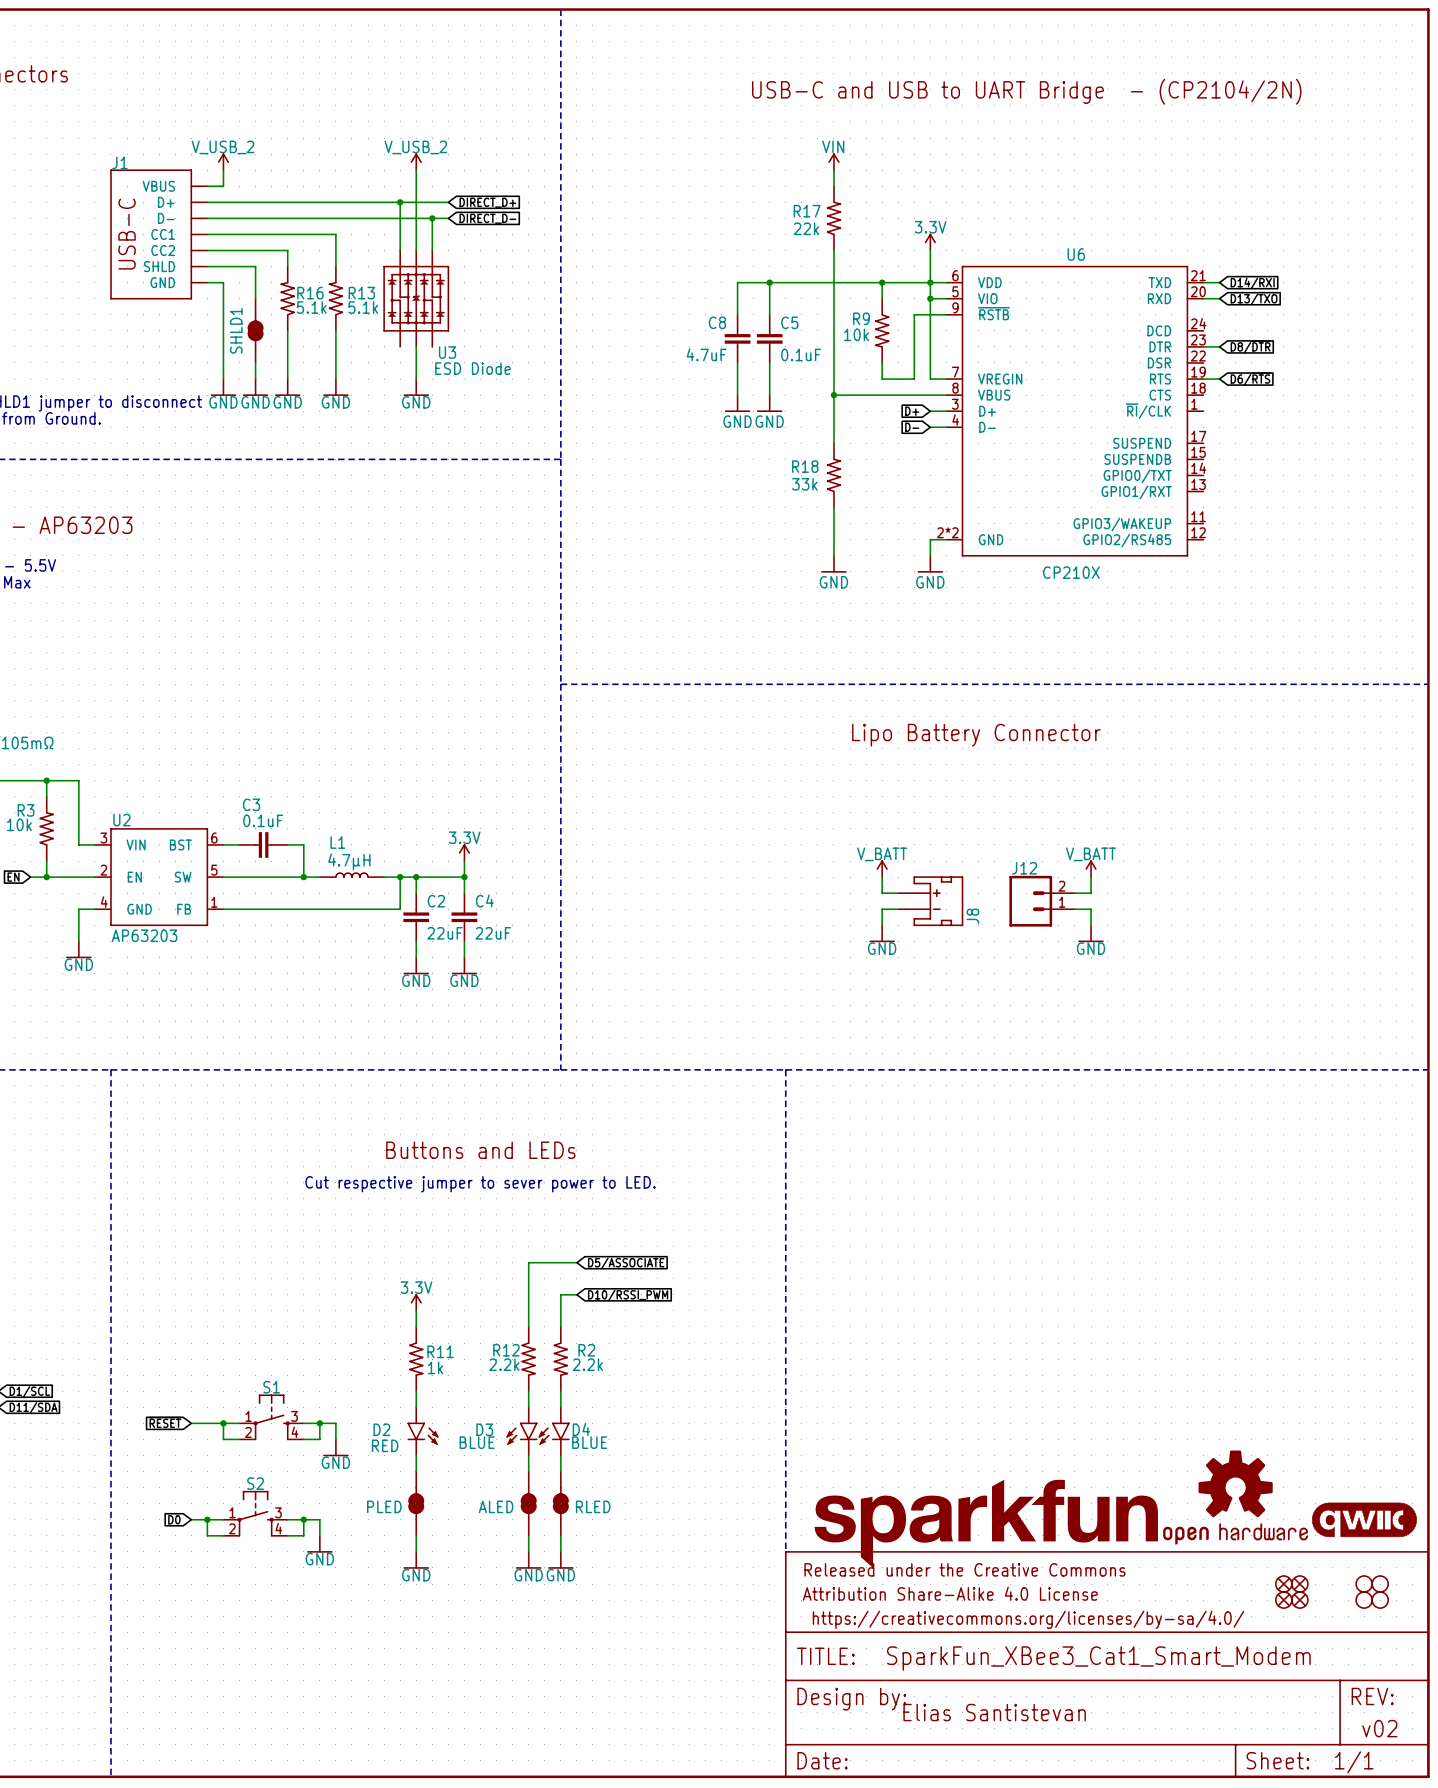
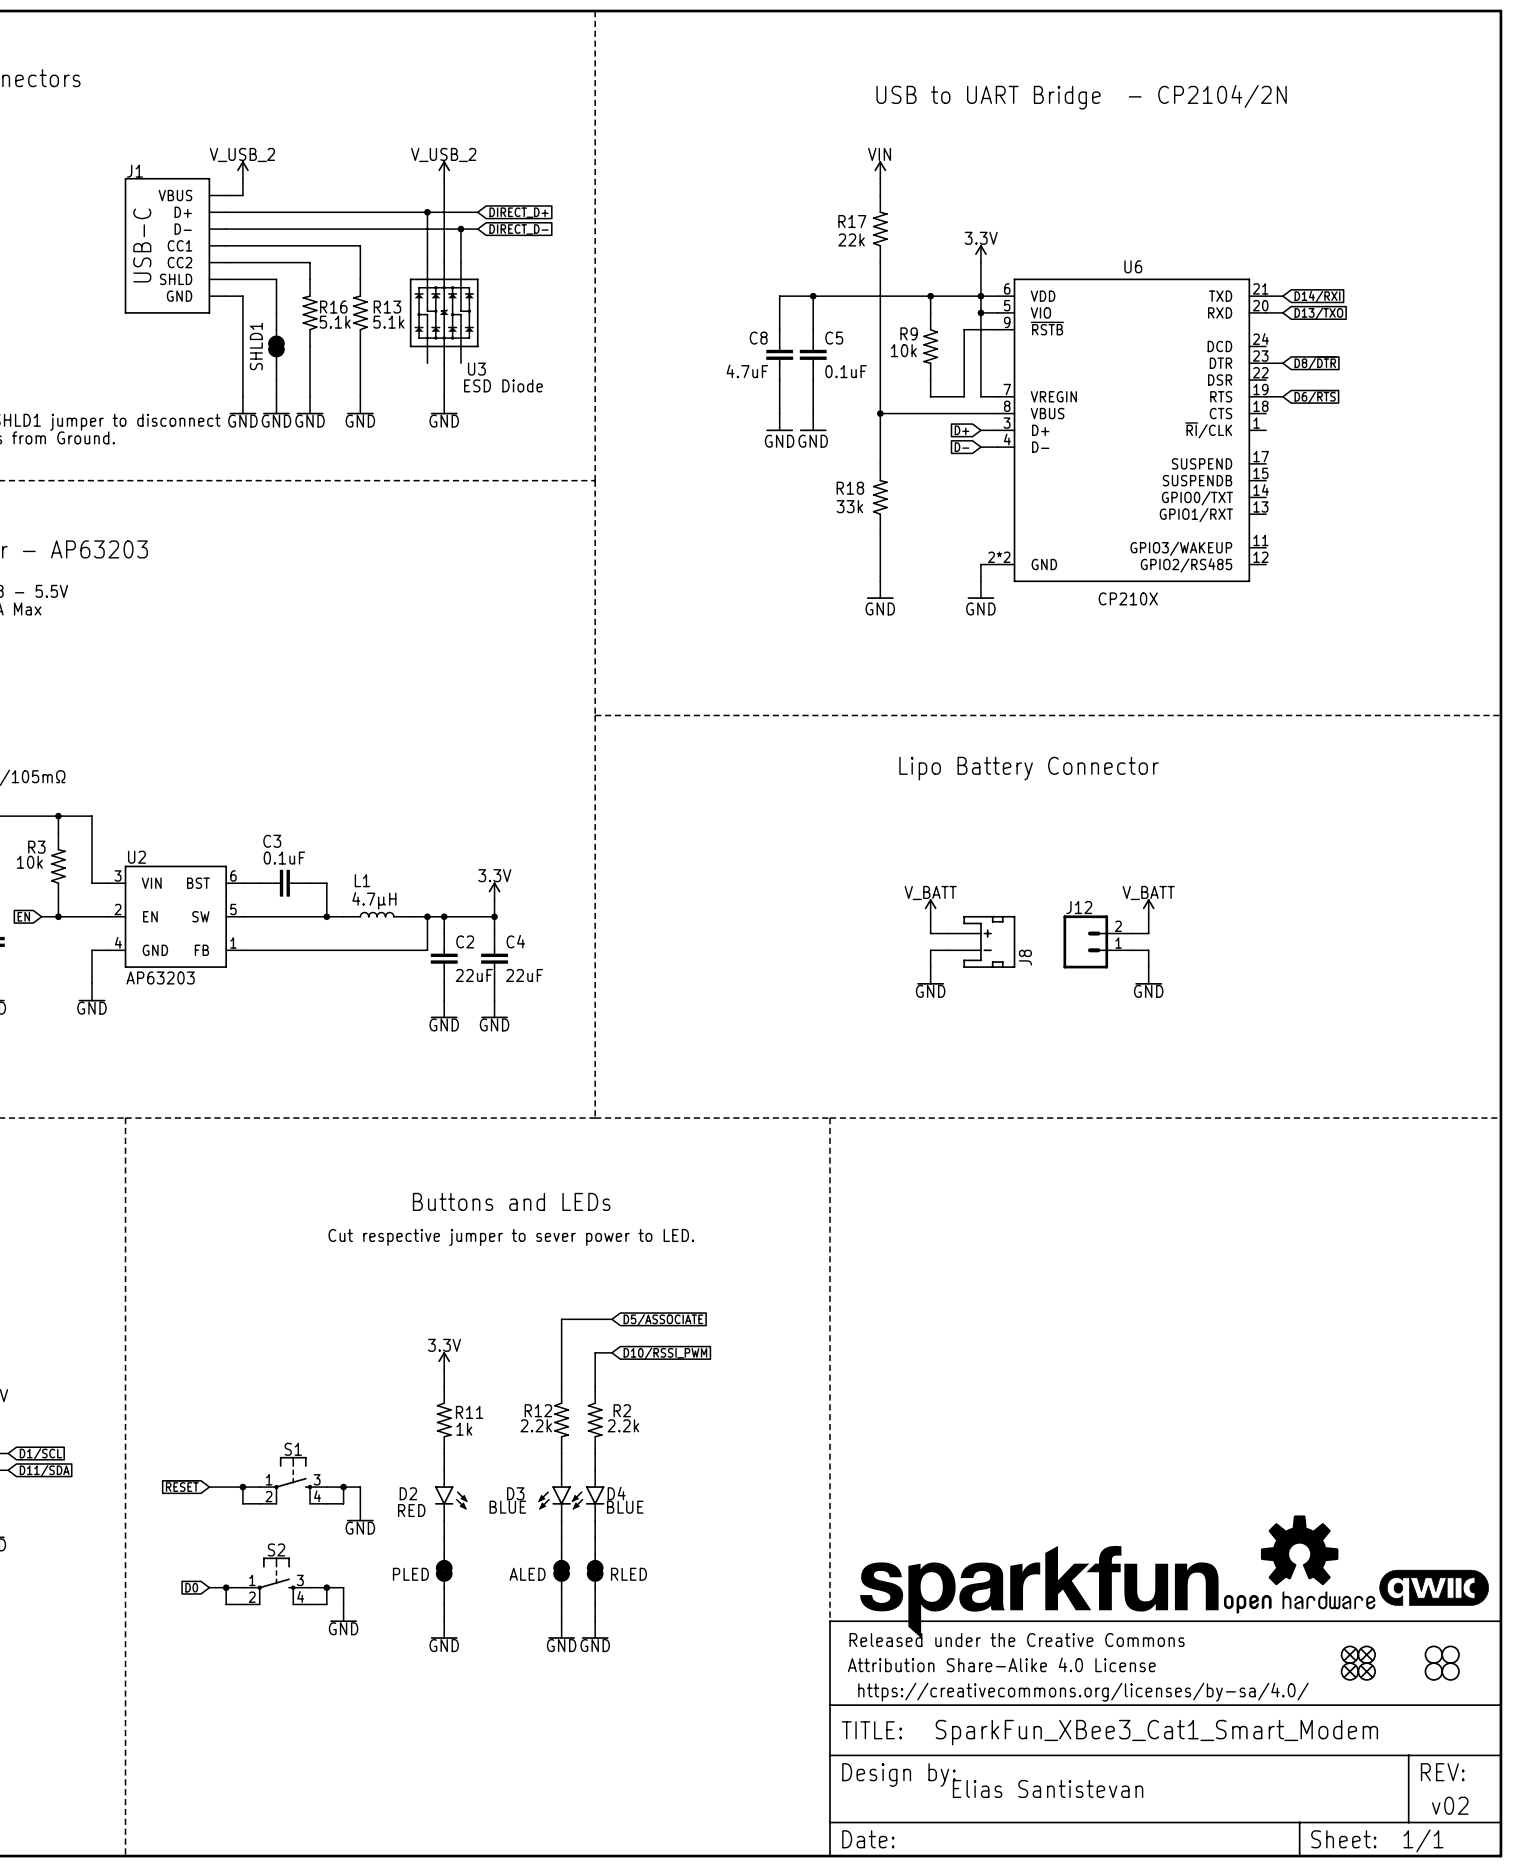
text: USB-C and USB to UART Bridge - (CP2104/2N) (1026, 91) -> USB to UART Bridge - CP2104/2N (1081, 97)

